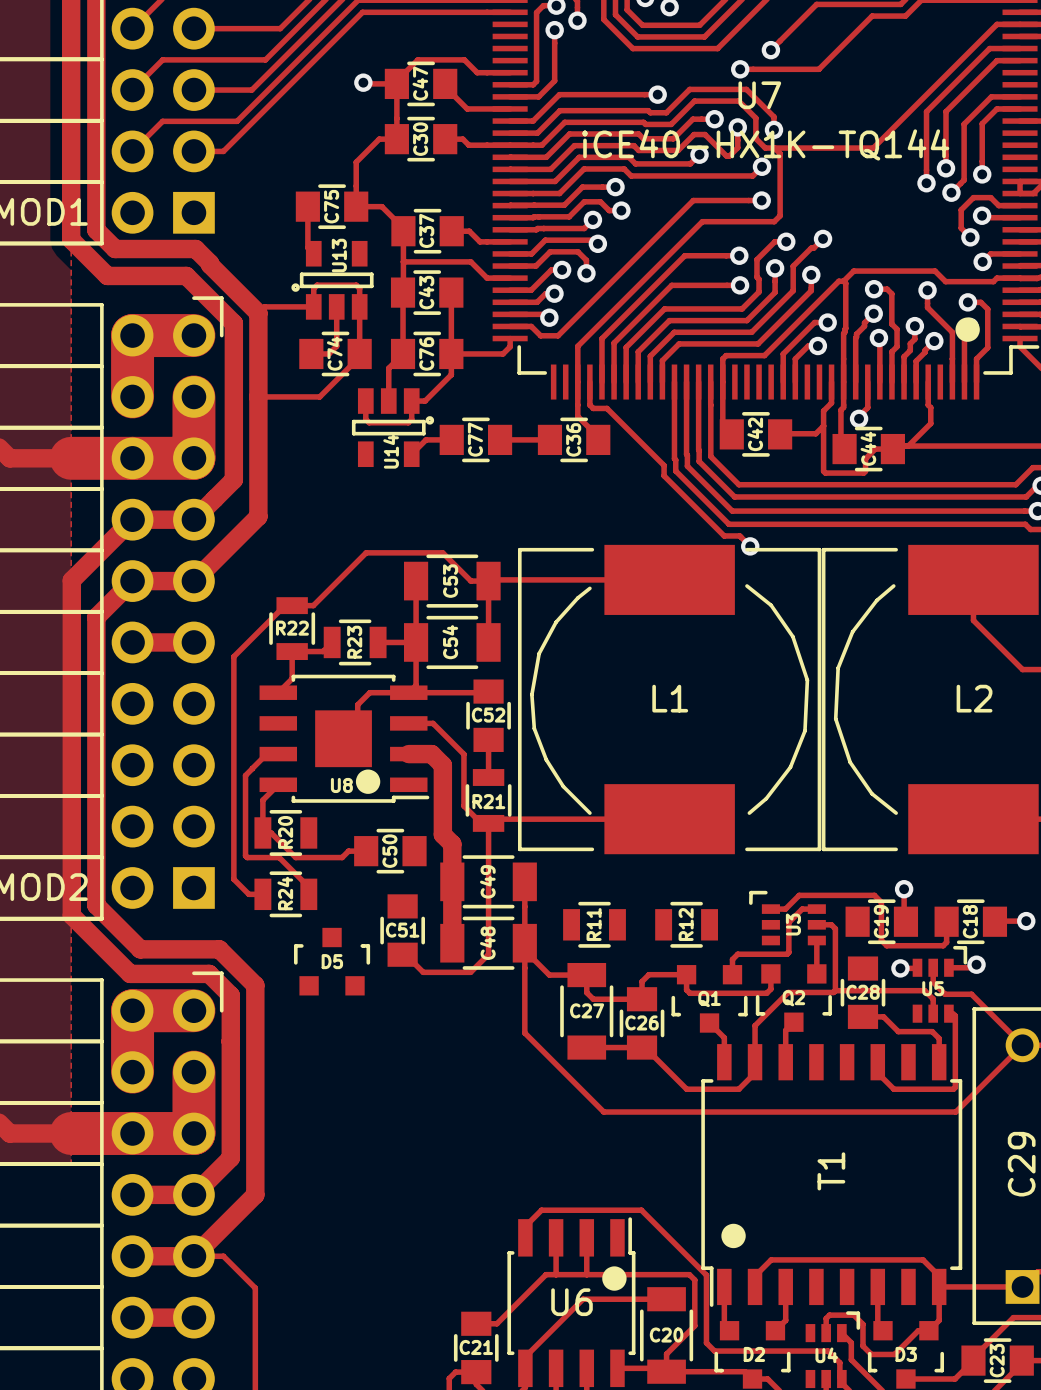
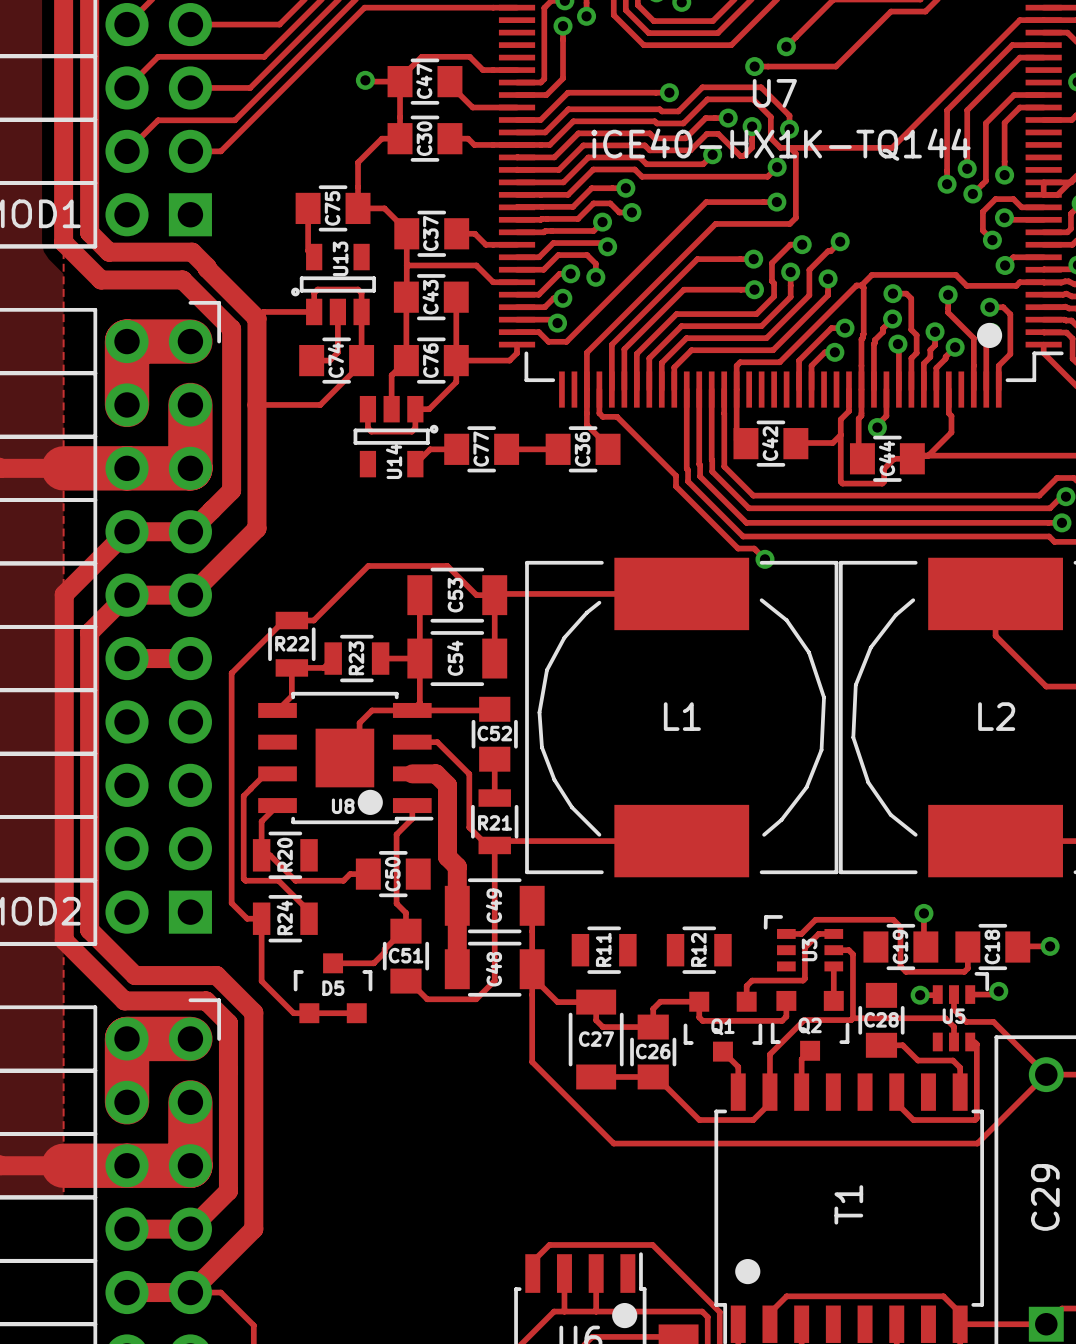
track: none -> (412, 805) (412, 818) (396, 834) (396, 903) (405, 912) (405, 931)
track: none -> (261, 918) (261, 981) (293, 1013) (356, 1013)
track: none -> (402, 931) (373, 963) (333, 963)

